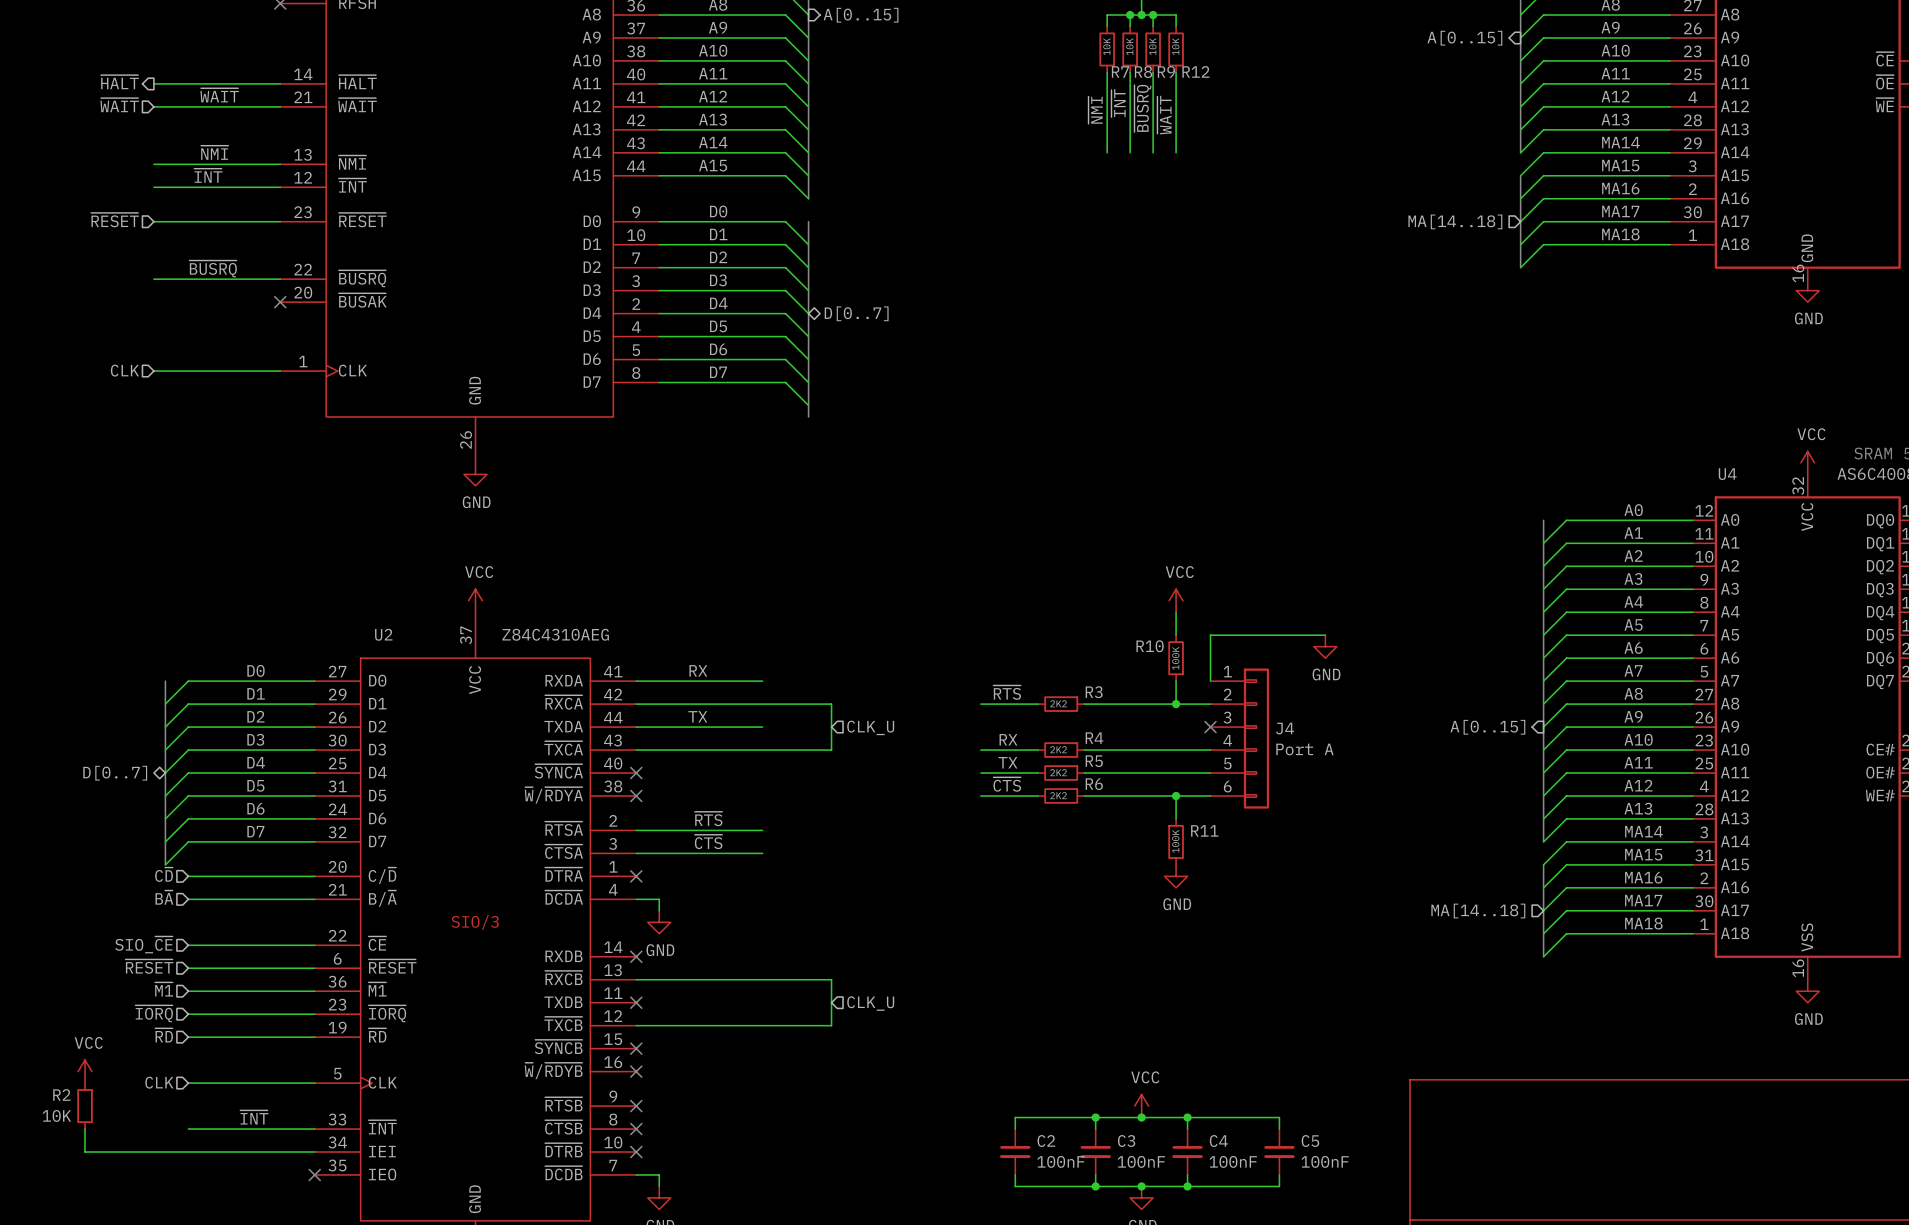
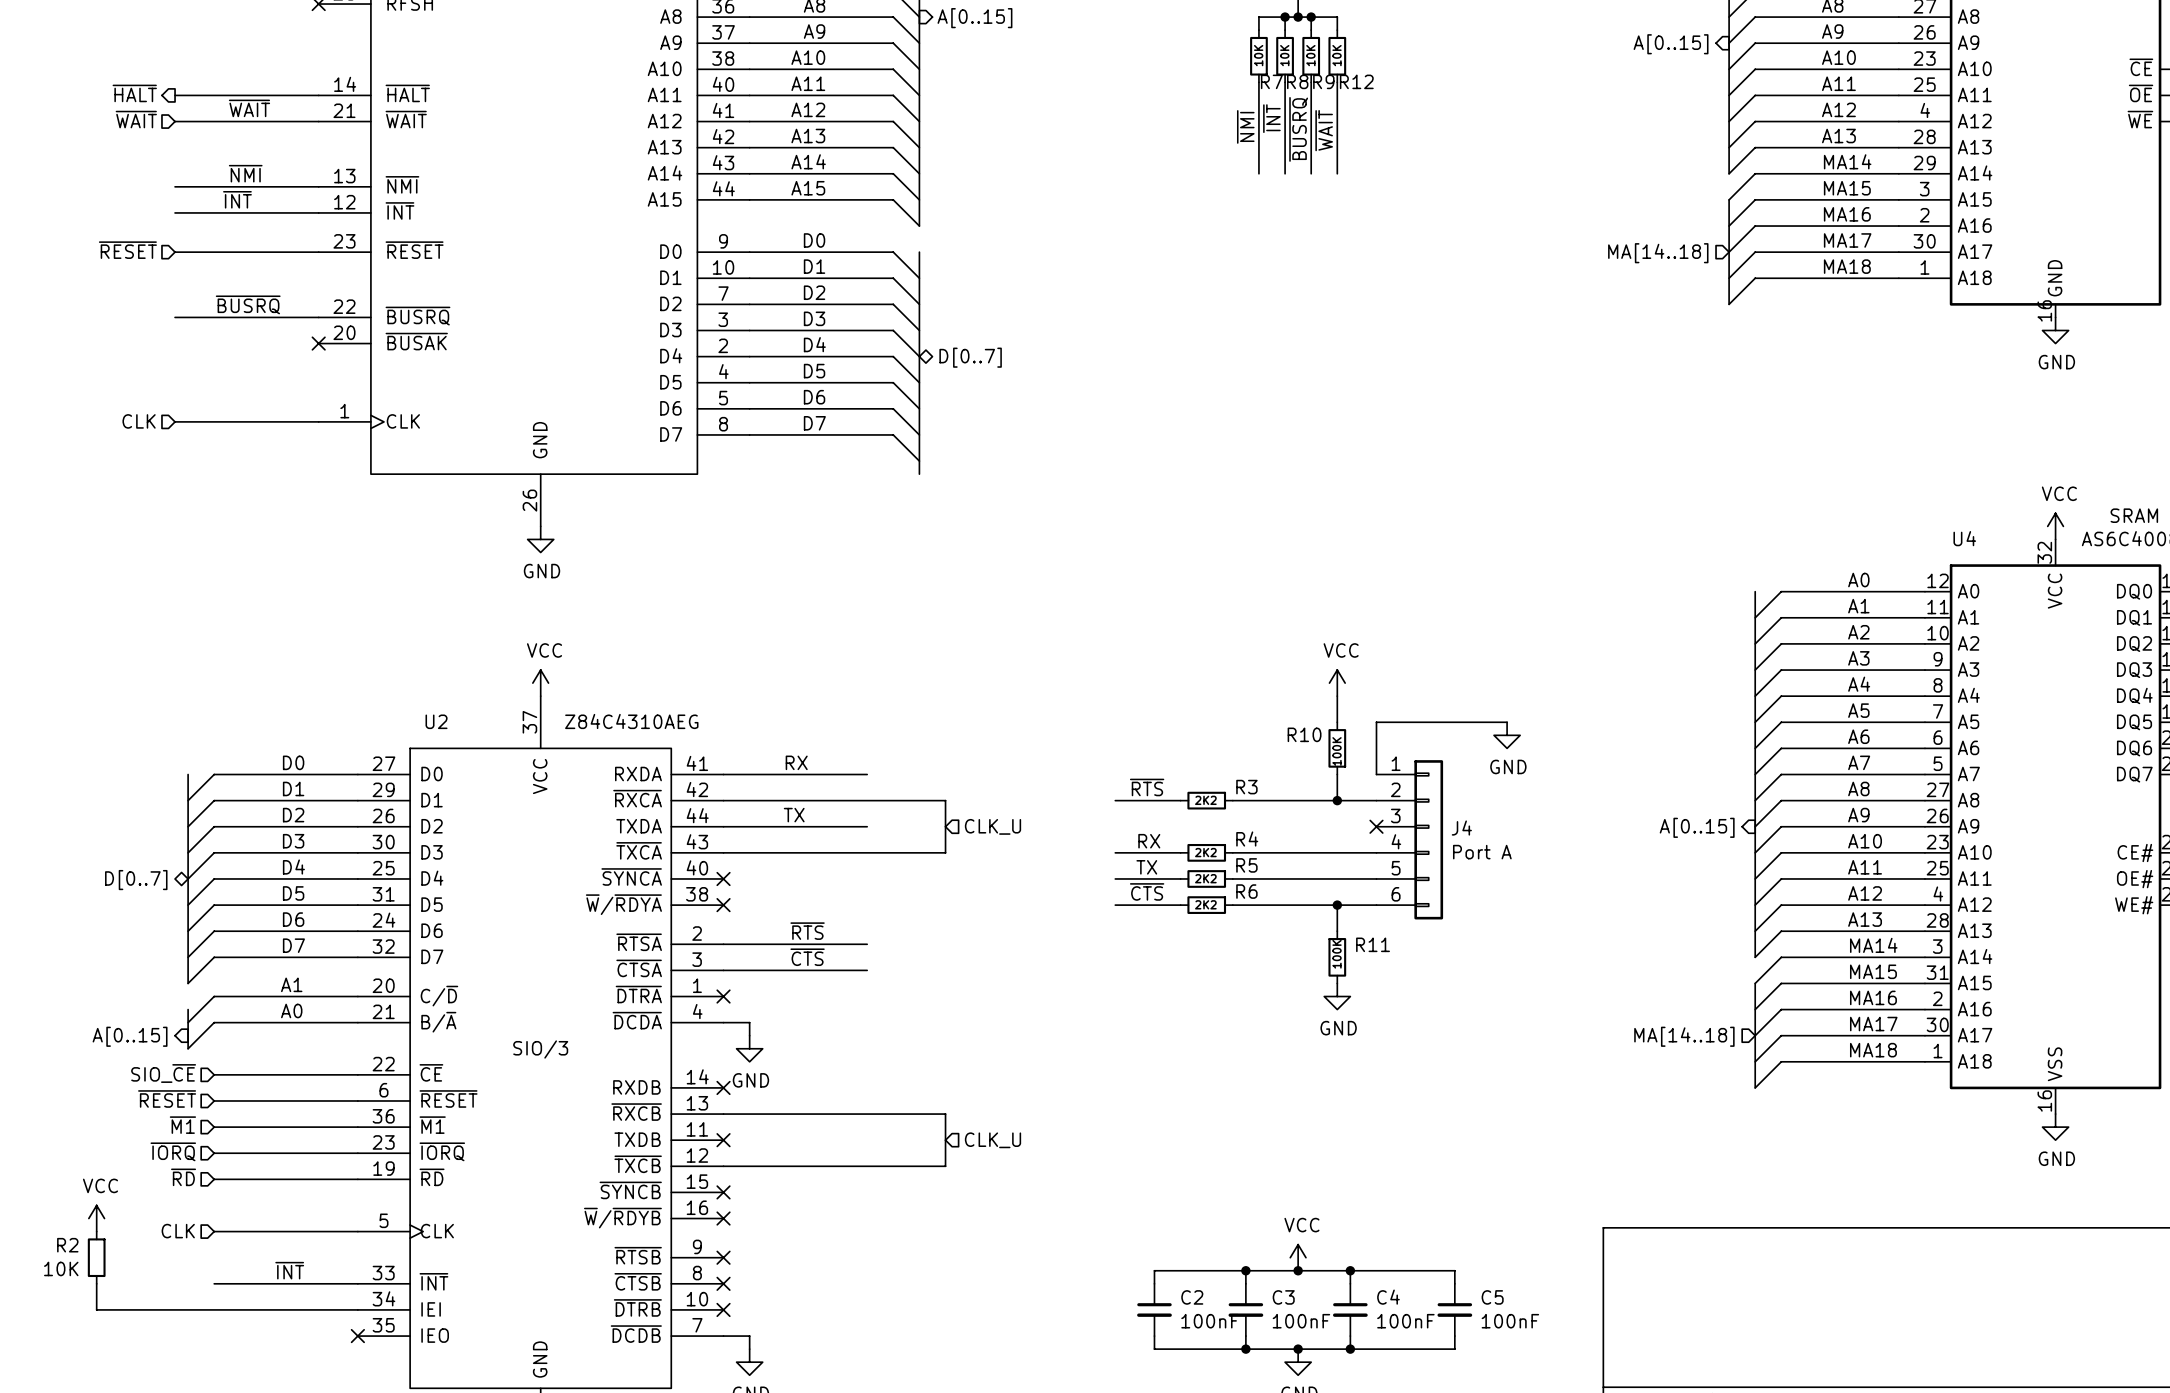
label: none -> A1 (291, 984)
hierarchical label: C~{D} (164, 874) -> none
wire: none -> (214, 996) (188, 1022)
bus: none -> (188, 1009) (188, 1048)
label: none -> A0 (291, 1010)
hierarchical label: B~{A} (164, 897) -> none
wire: none -> (214, 1022) (188, 1048)
hierarchical label: none -> A[0..15] (130, 1036)

